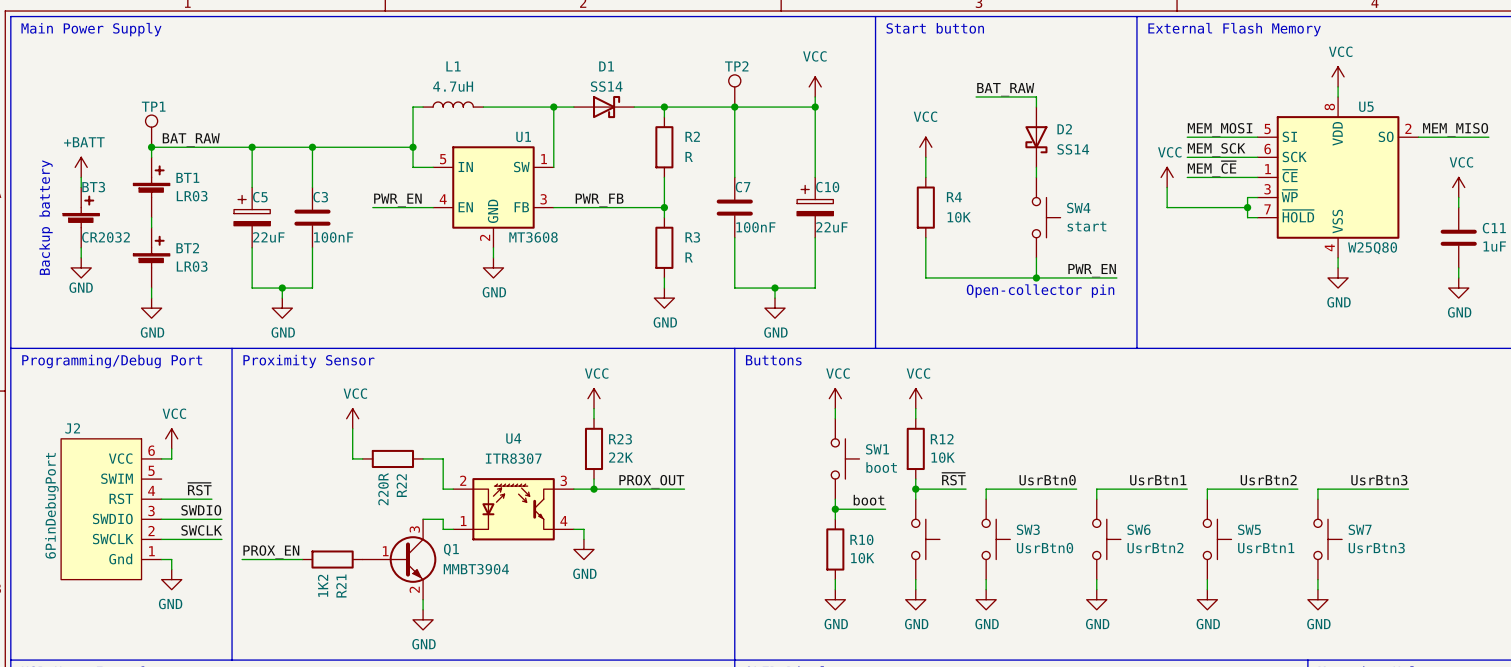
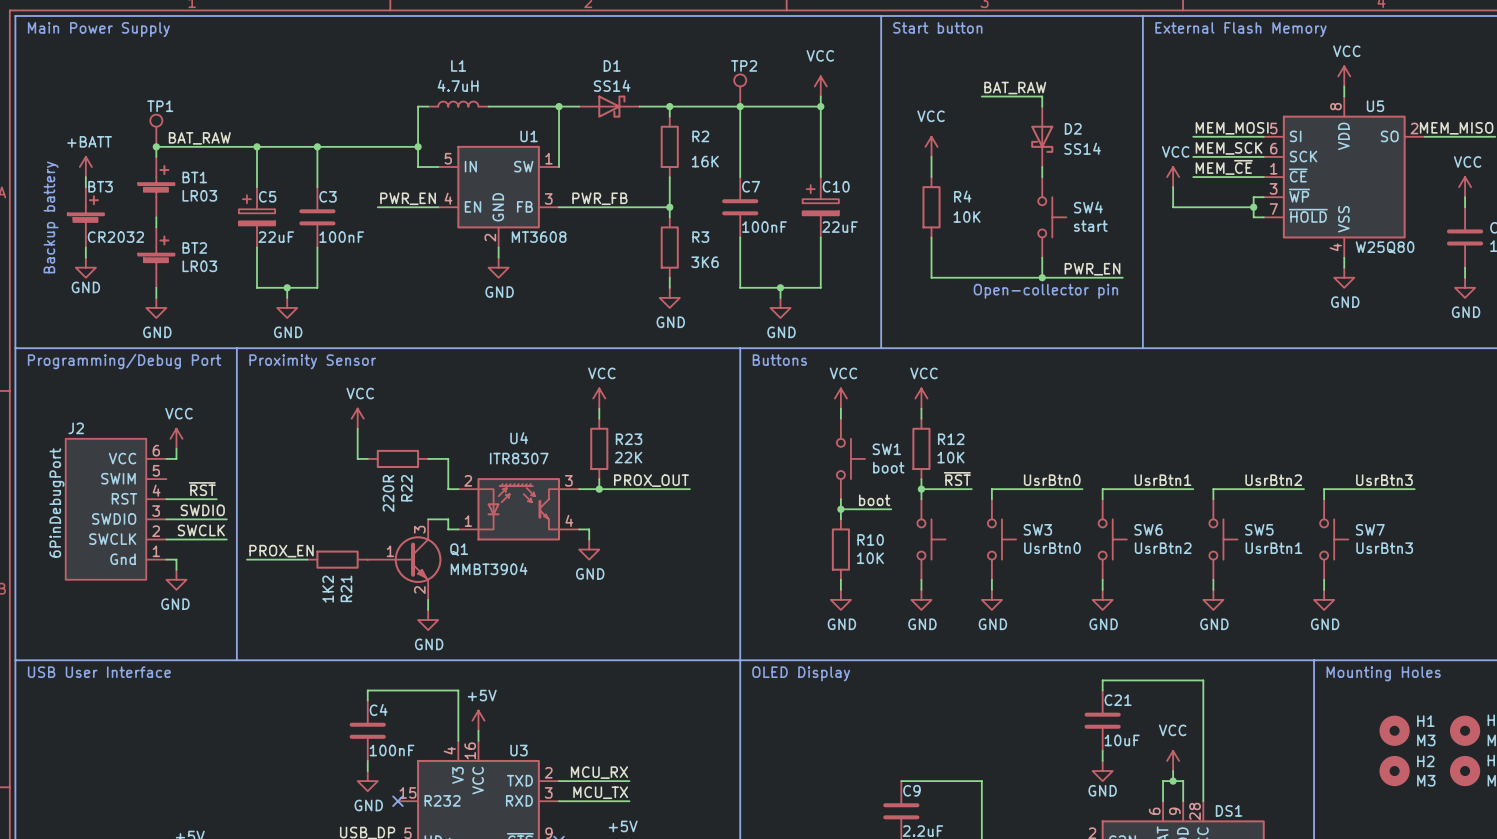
R2 value: R (689, 156) -> 16K (705, 161)
R3 value: R (689, 257) -> 3K6 (705, 262)

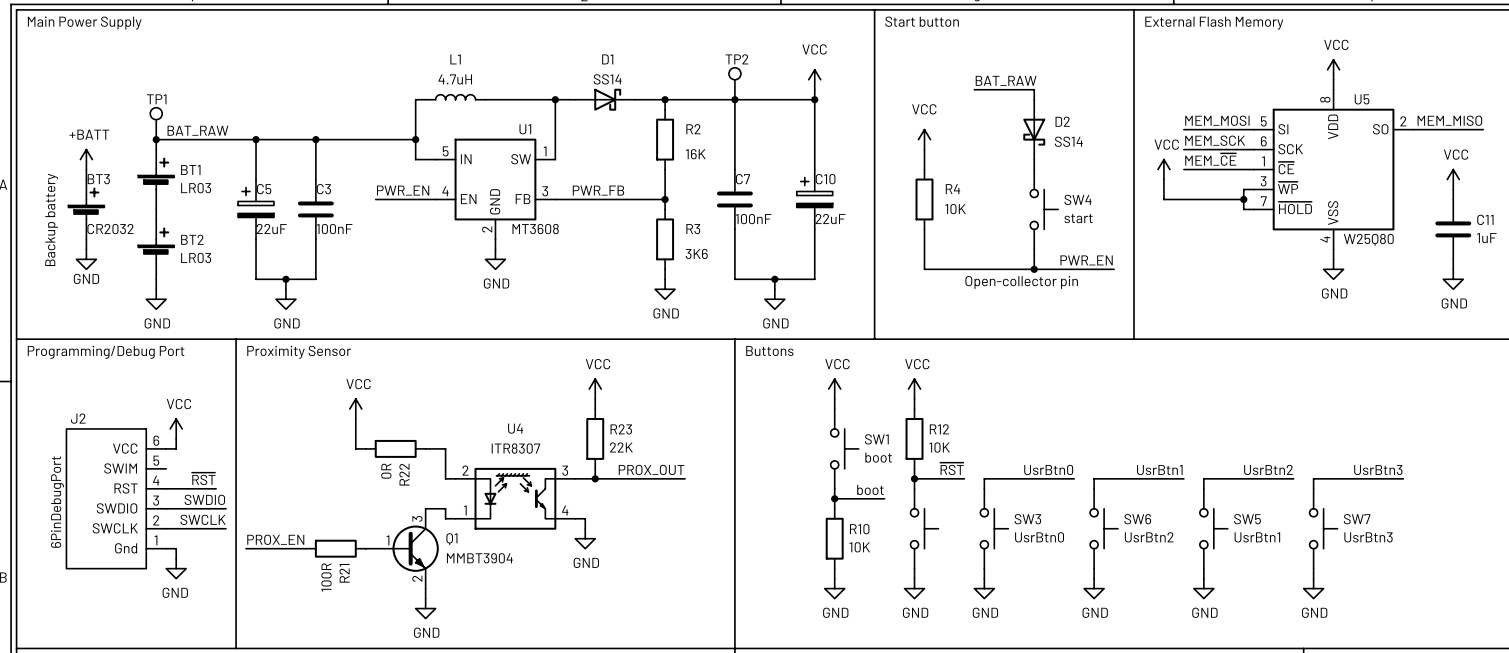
R22 value: 220R (388, 493) -> 0R (386, 471)
R21 value: 1K2 (328, 589) -> 100R (326, 577)

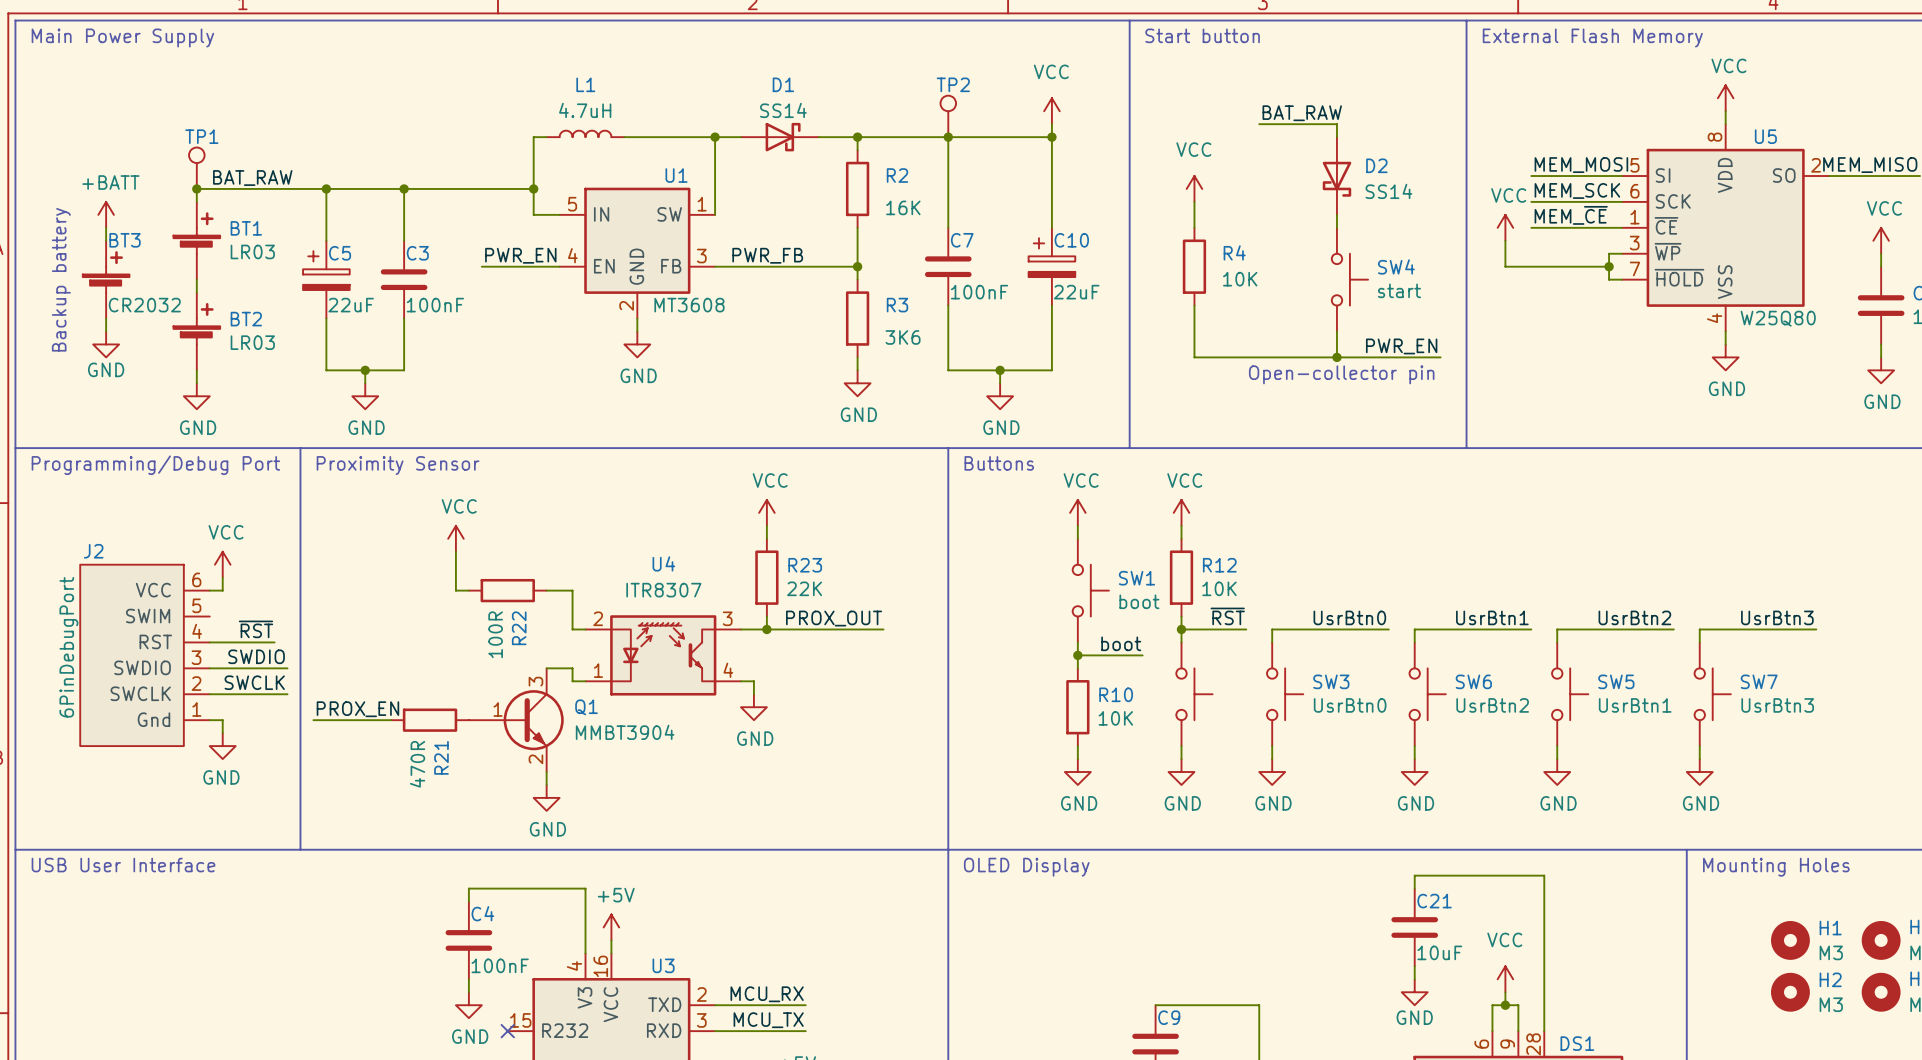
R22 value: 0R (386, 471) -> 100R (495, 634)
R21 value: 100R (326, 577) -> 470R (417, 764)

